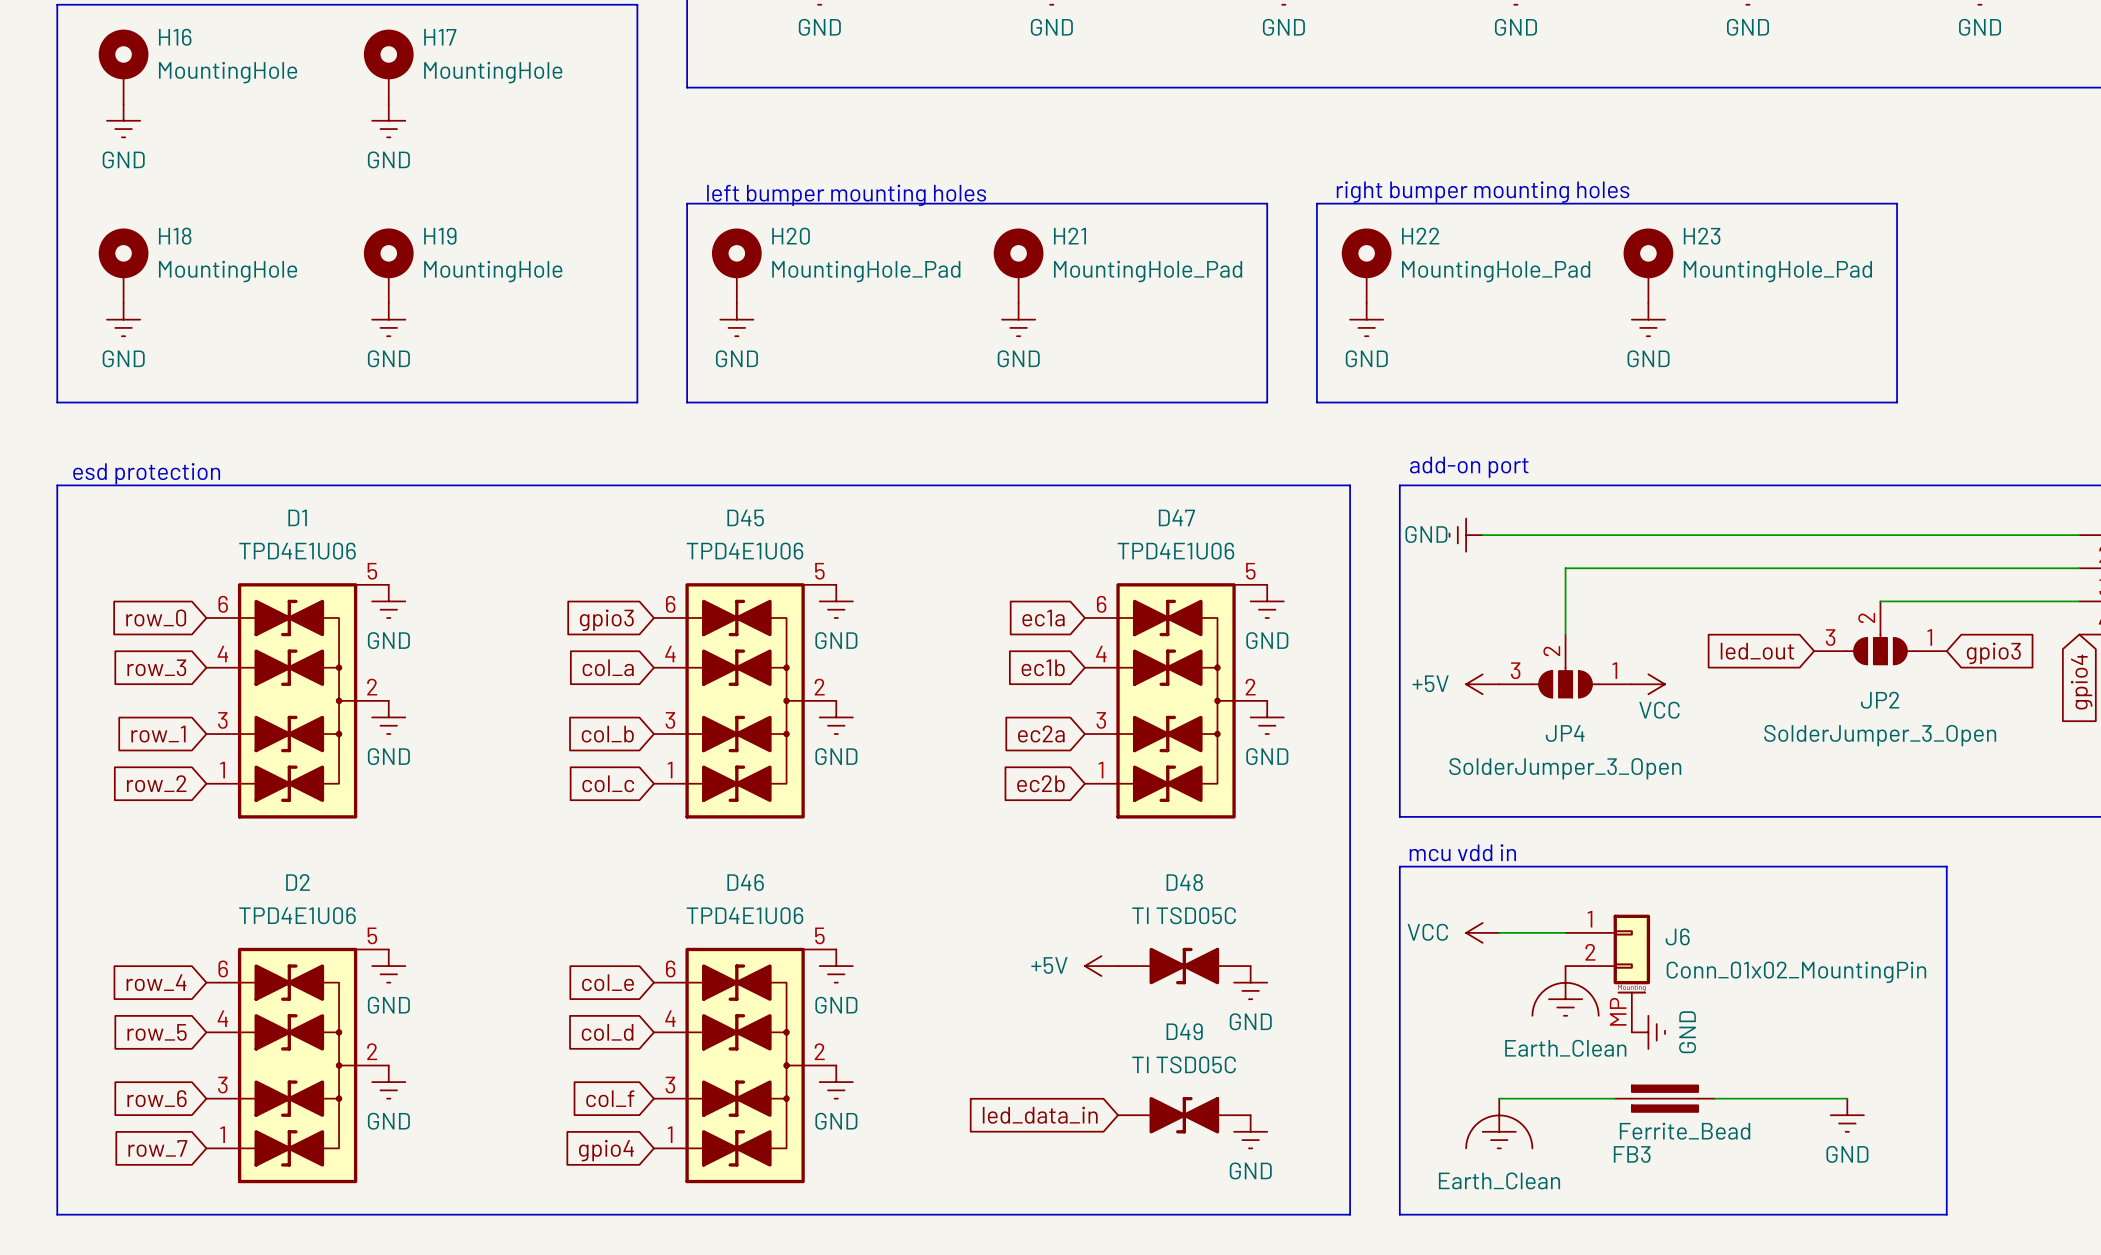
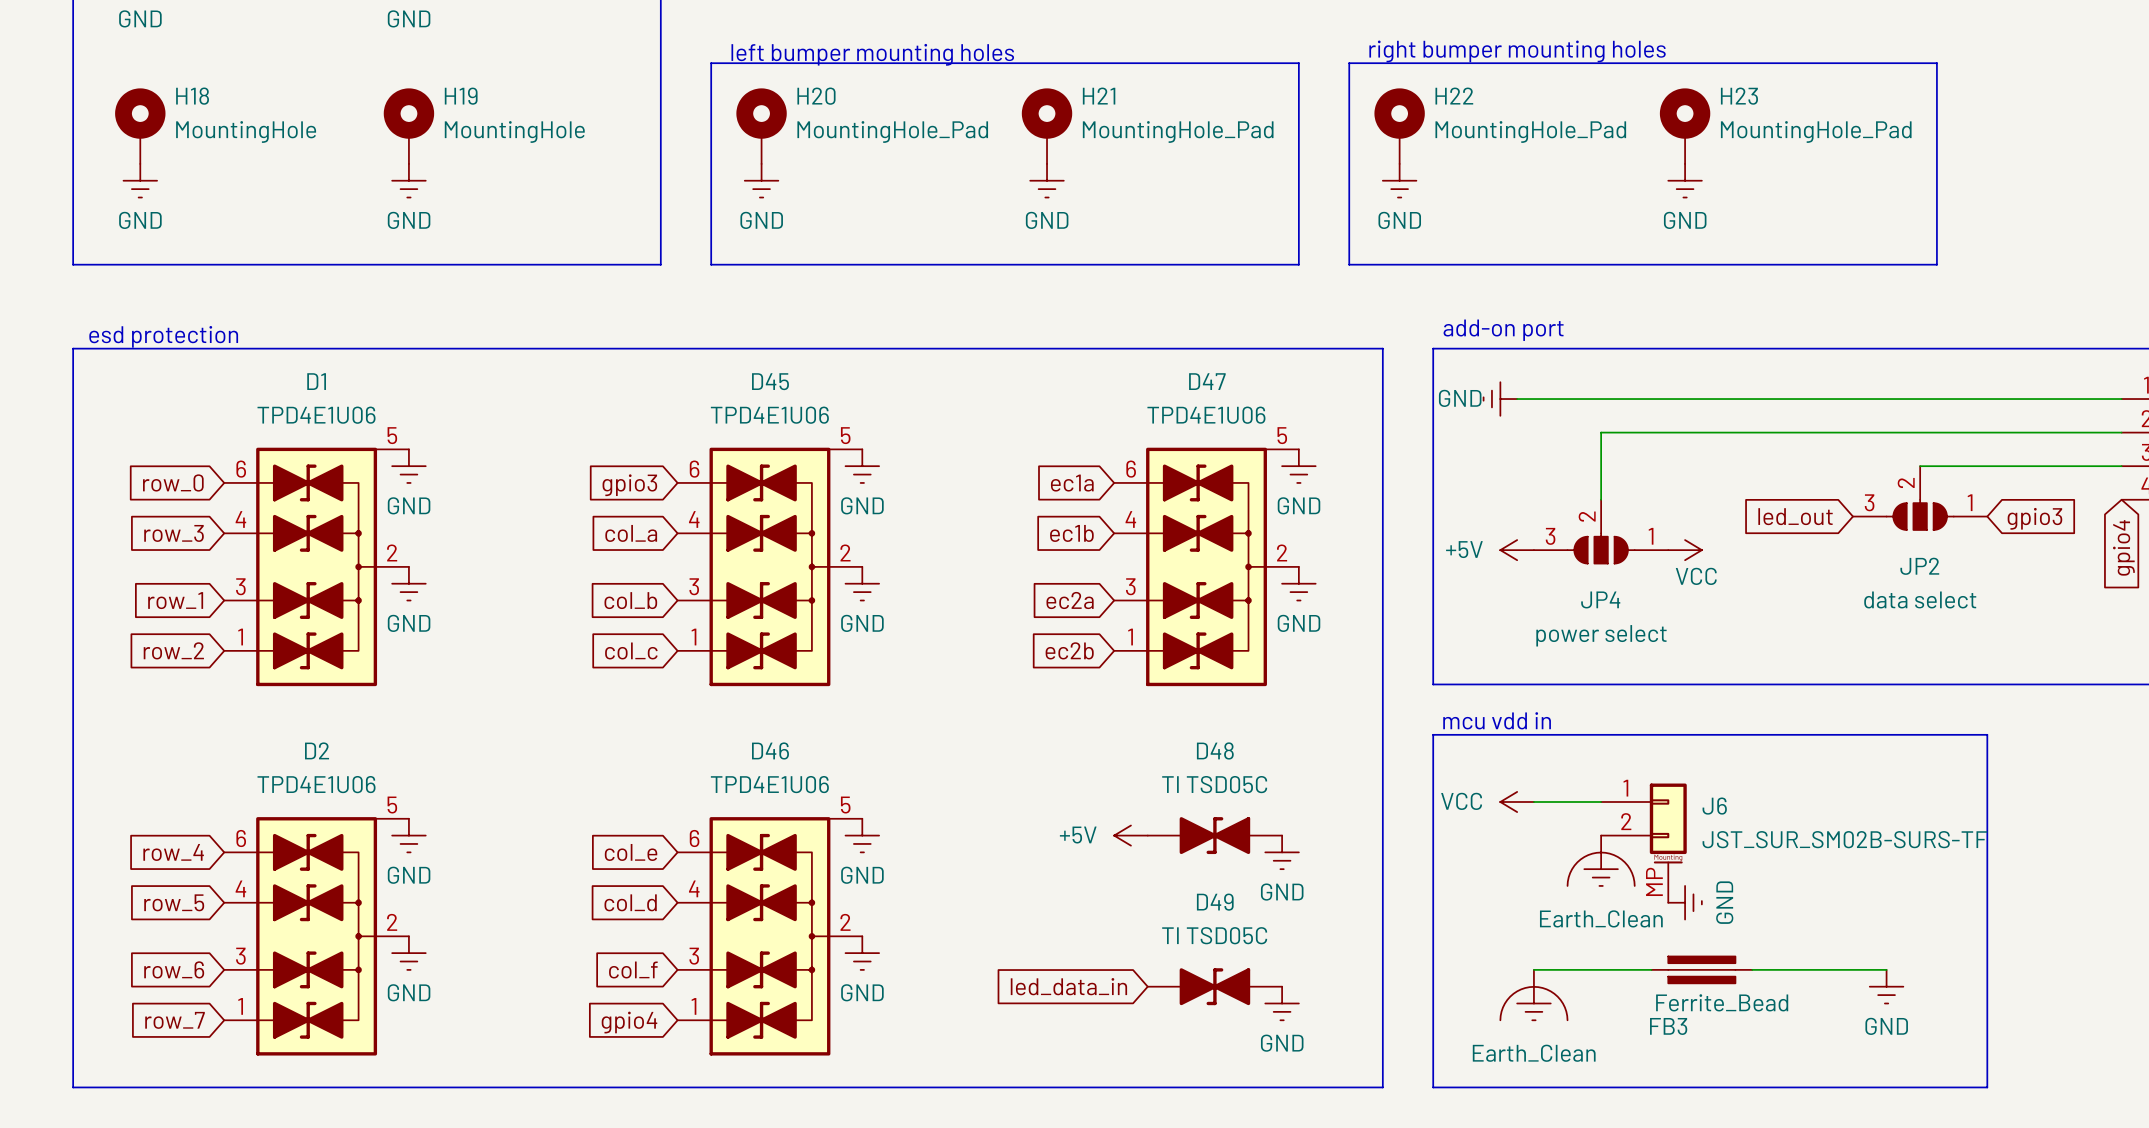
JP2 value: SolderJumper_3_Open (1880, 735) -> data select (1920, 599)
JP4 value: SolderJumper_3_Open (1565, 768) -> power select (1601, 635)
J6 value: Conn_01x02_MountingPin (1796, 972) -> JST_SUR_SM02B-SURS-TF (1844, 839)

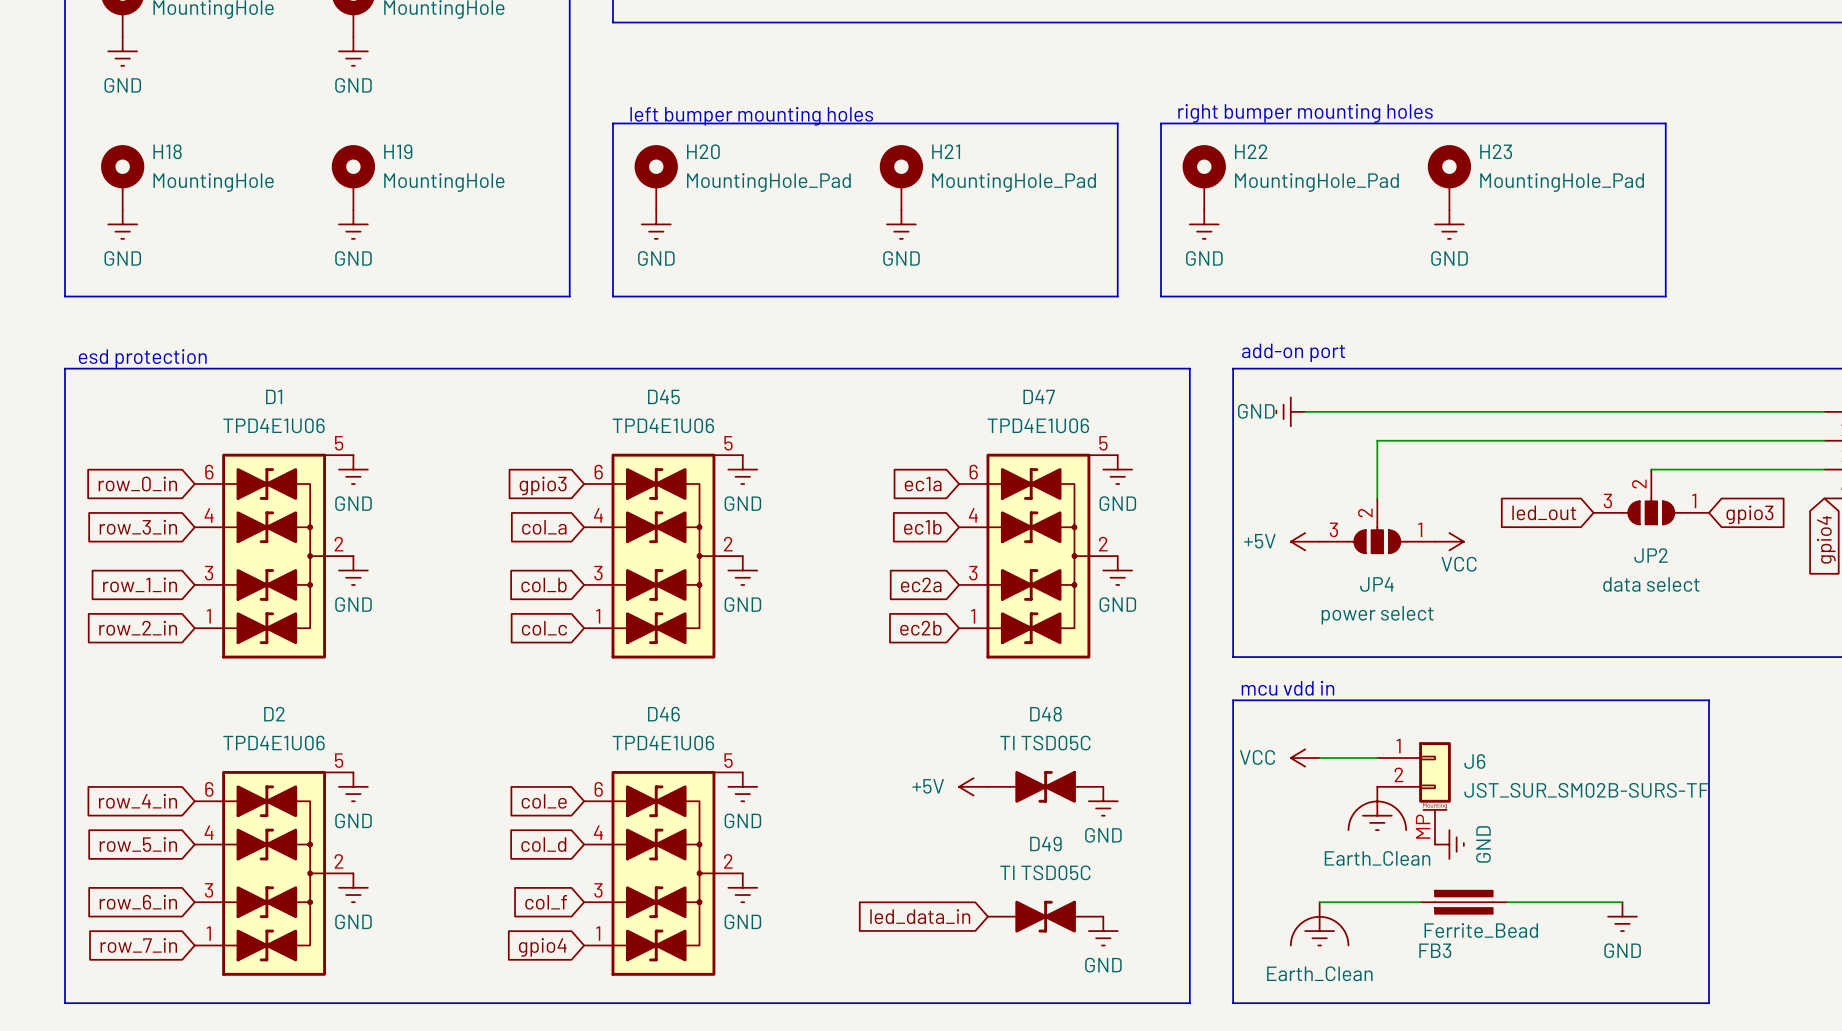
global label: row_0 (173, 482) -> row_0_in (137, 484)
global label: row_3 (174, 533) -> row_3_in (138, 527)
global label: row_1 (175, 600) -> row_1_in (140, 584)
global label: row_2 (173, 650) -> row_2_in (138, 628)
global label: row_4 (173, 852) -> row_4_in (137, 801)
global label: row_5 (174, 902) -> row_5_in (138, 844)
global label: row_6 (174, 969) -> row_6_in (138, 902)
global label: row_7 (175, 1020) -> row_7_in (138, 945)

